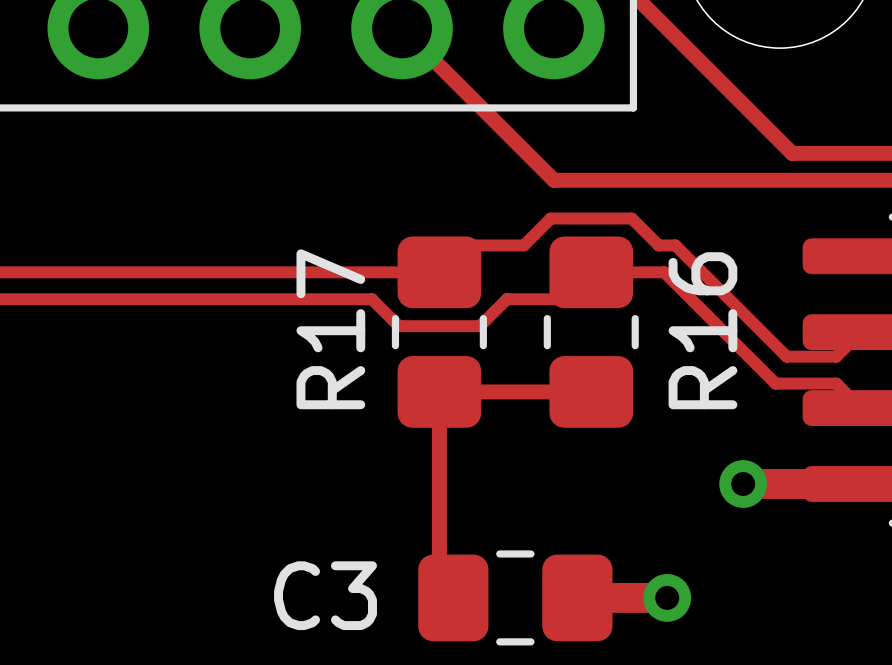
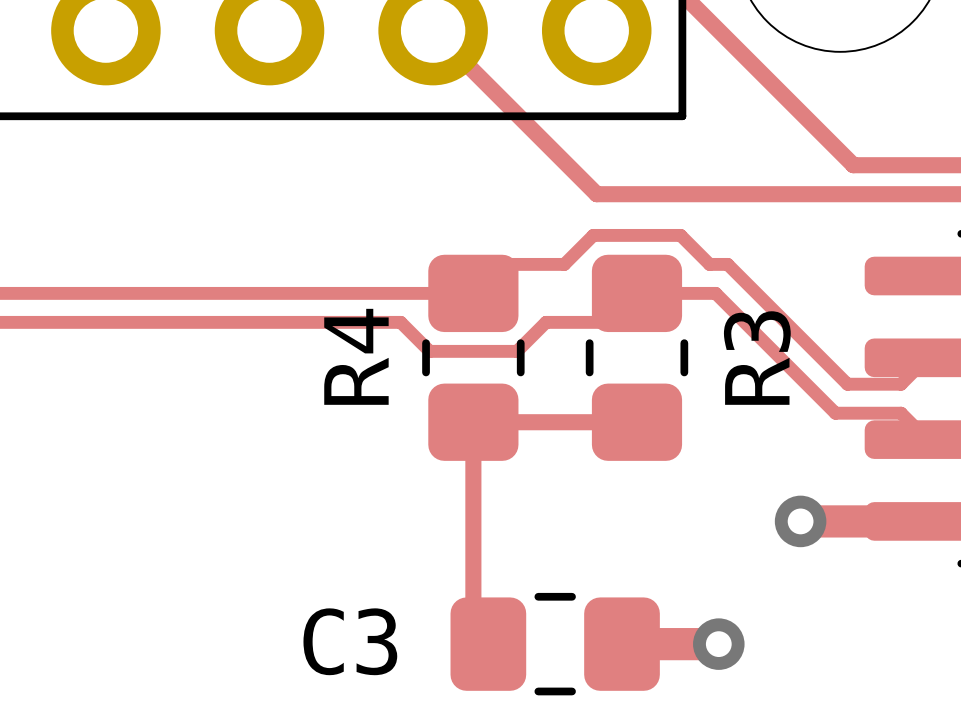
R17 name: R17 (330, 329) -> R4 (356, 356)
R16 name: R16 (702, 330) -> R3 (757, 358)

